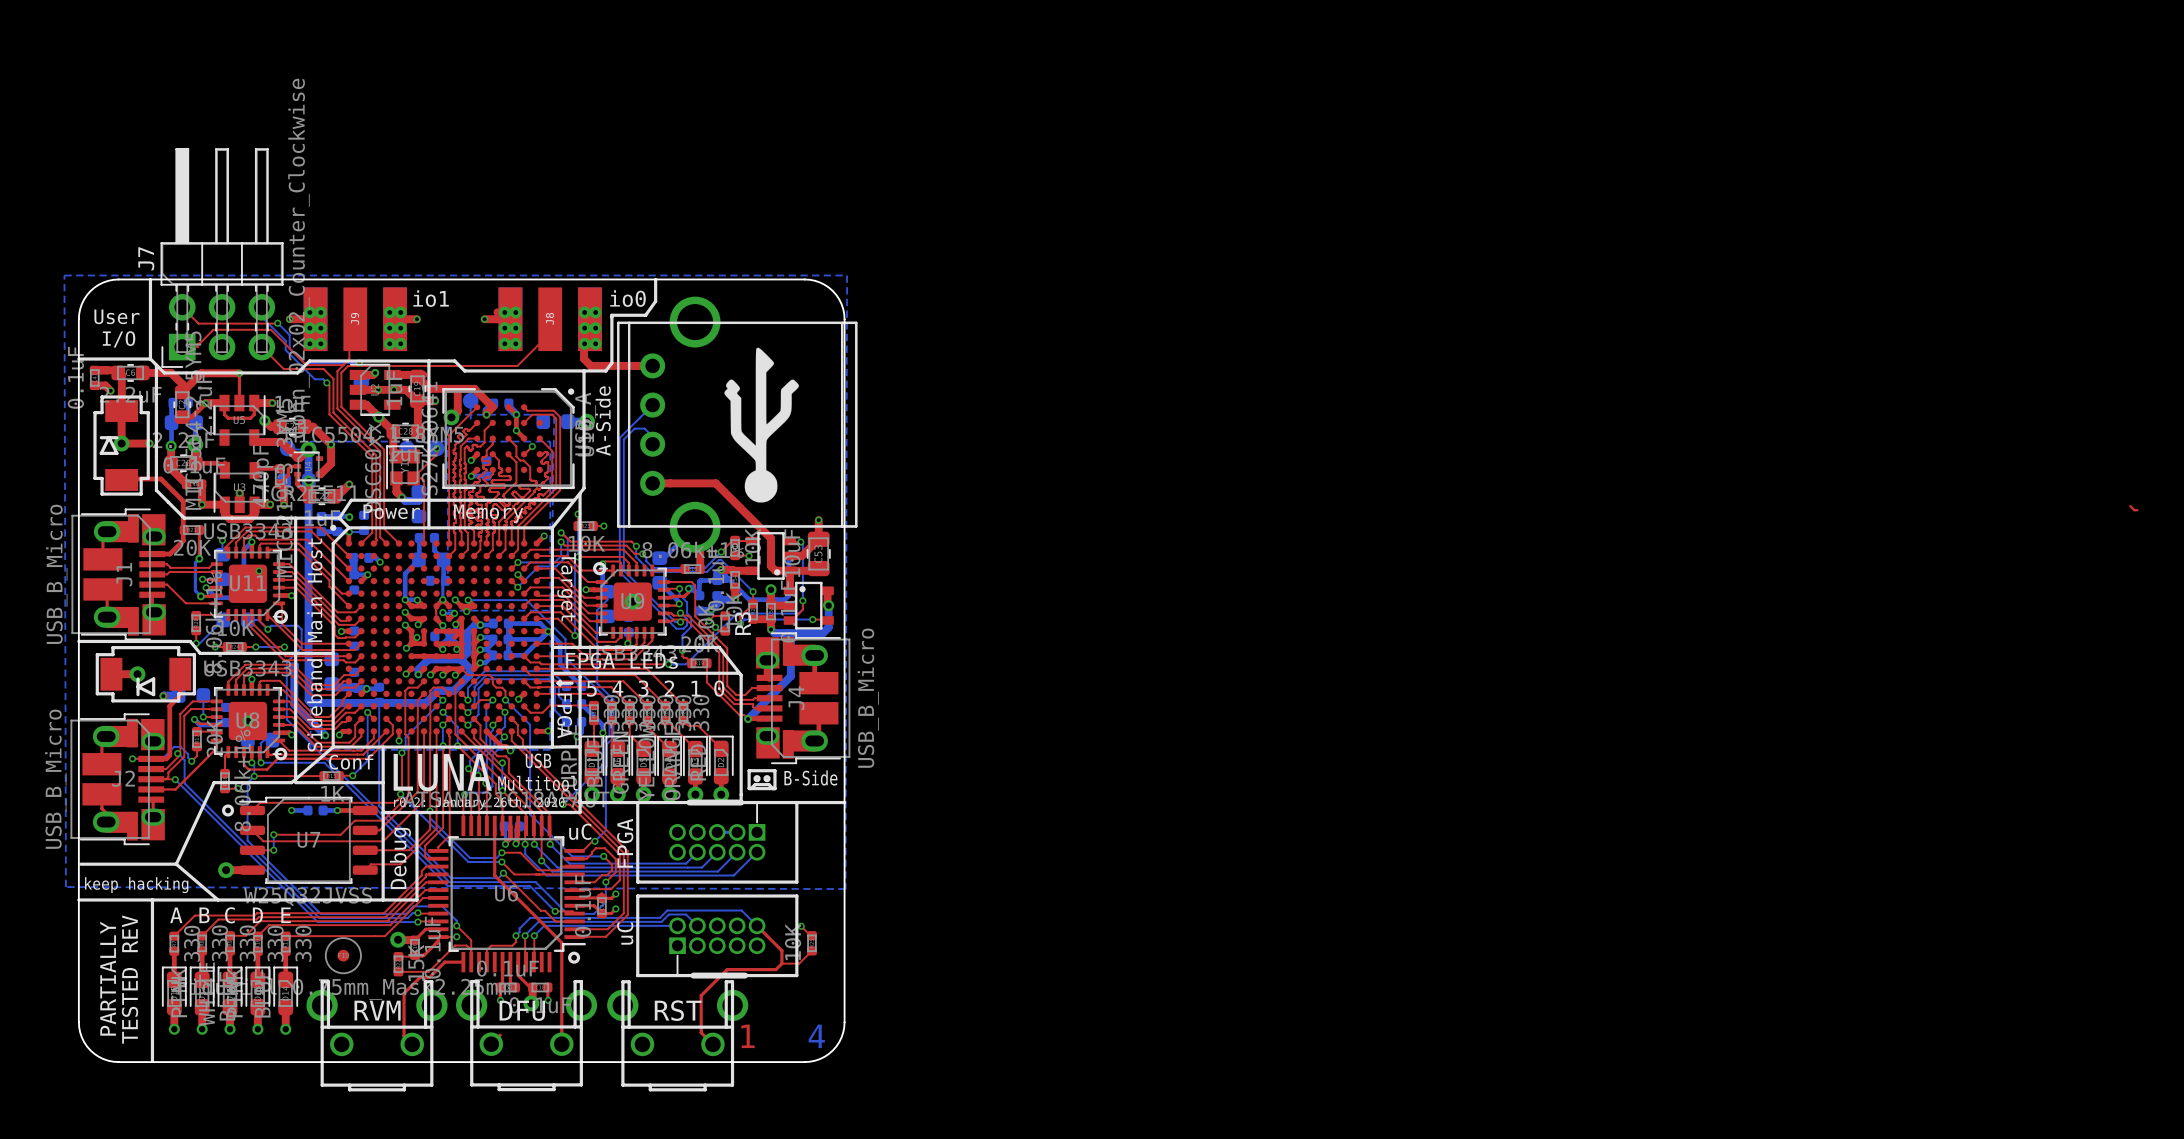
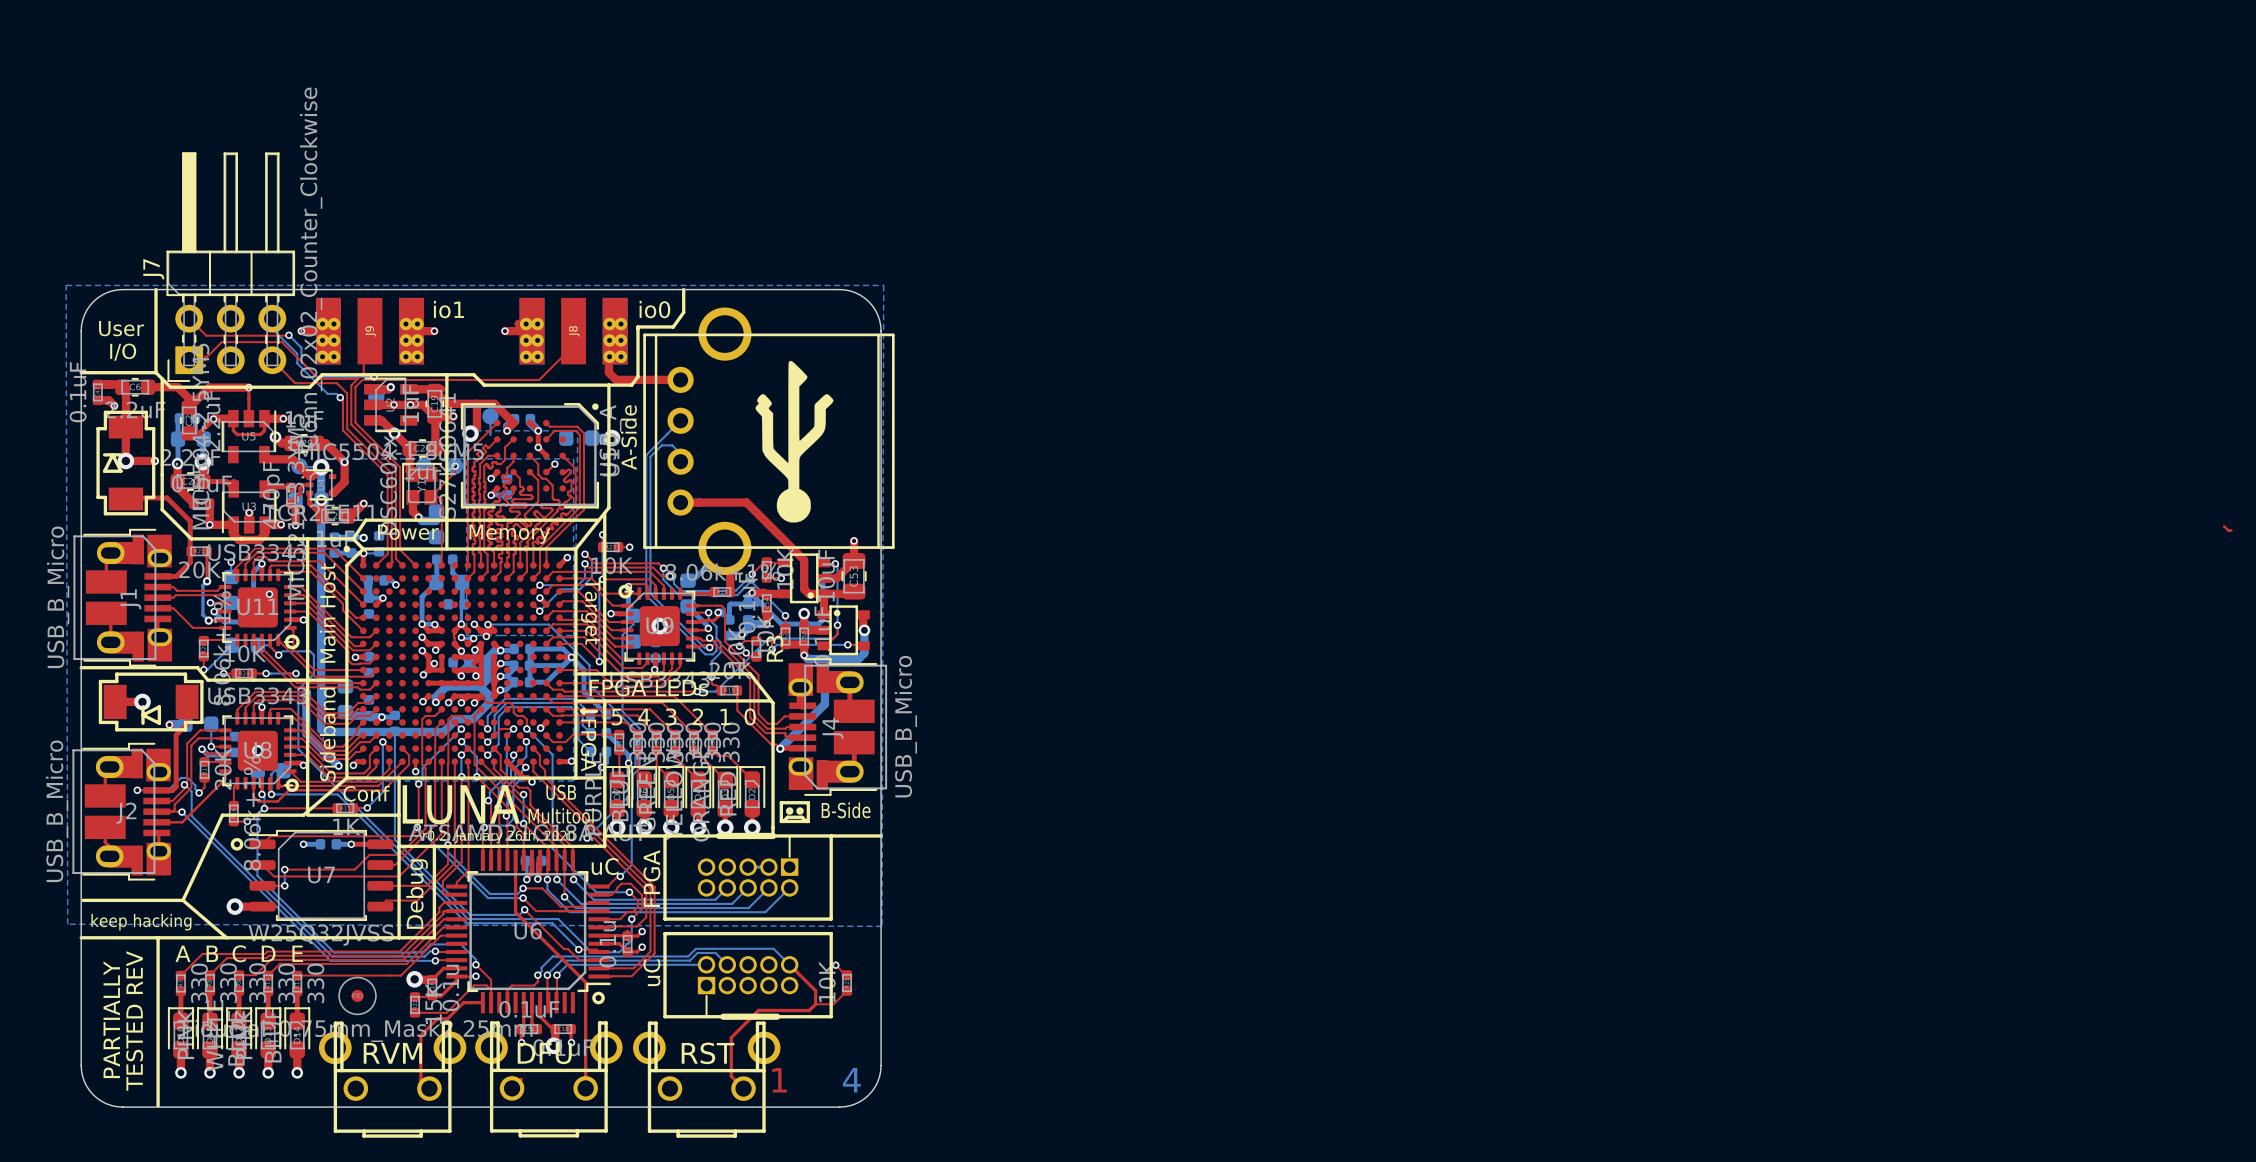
part value: 0.1uF (583, 905) -> 0.1u (607, 944)
part value: 0.1uF (432, 947) -> 0.1u (450, 987)

